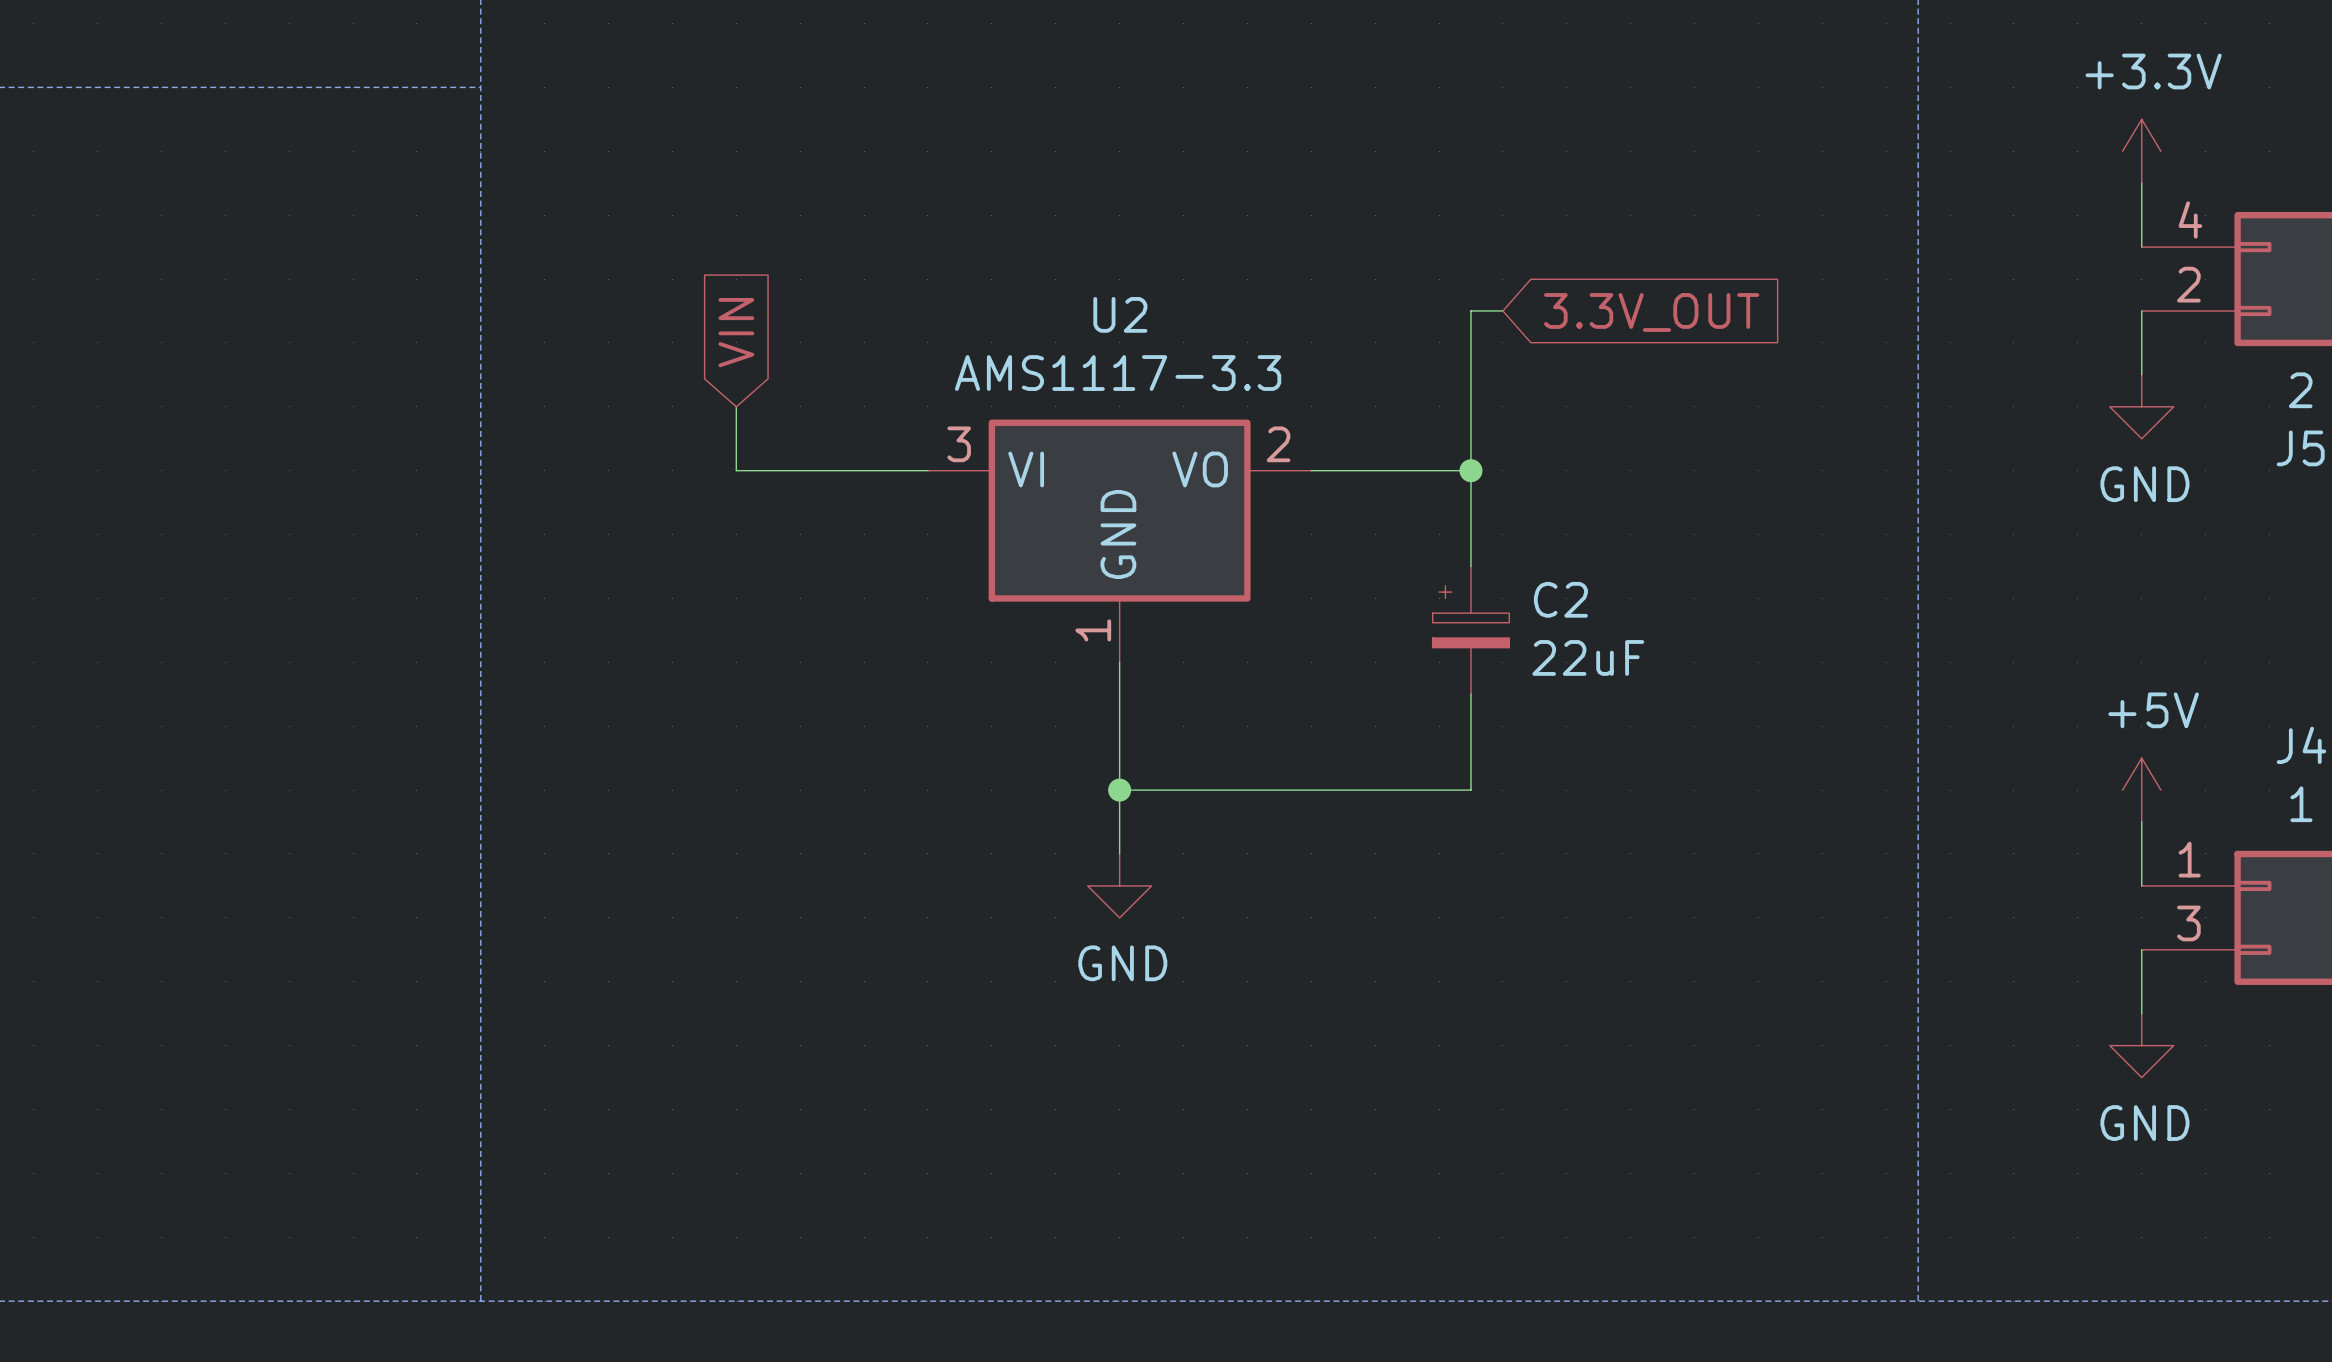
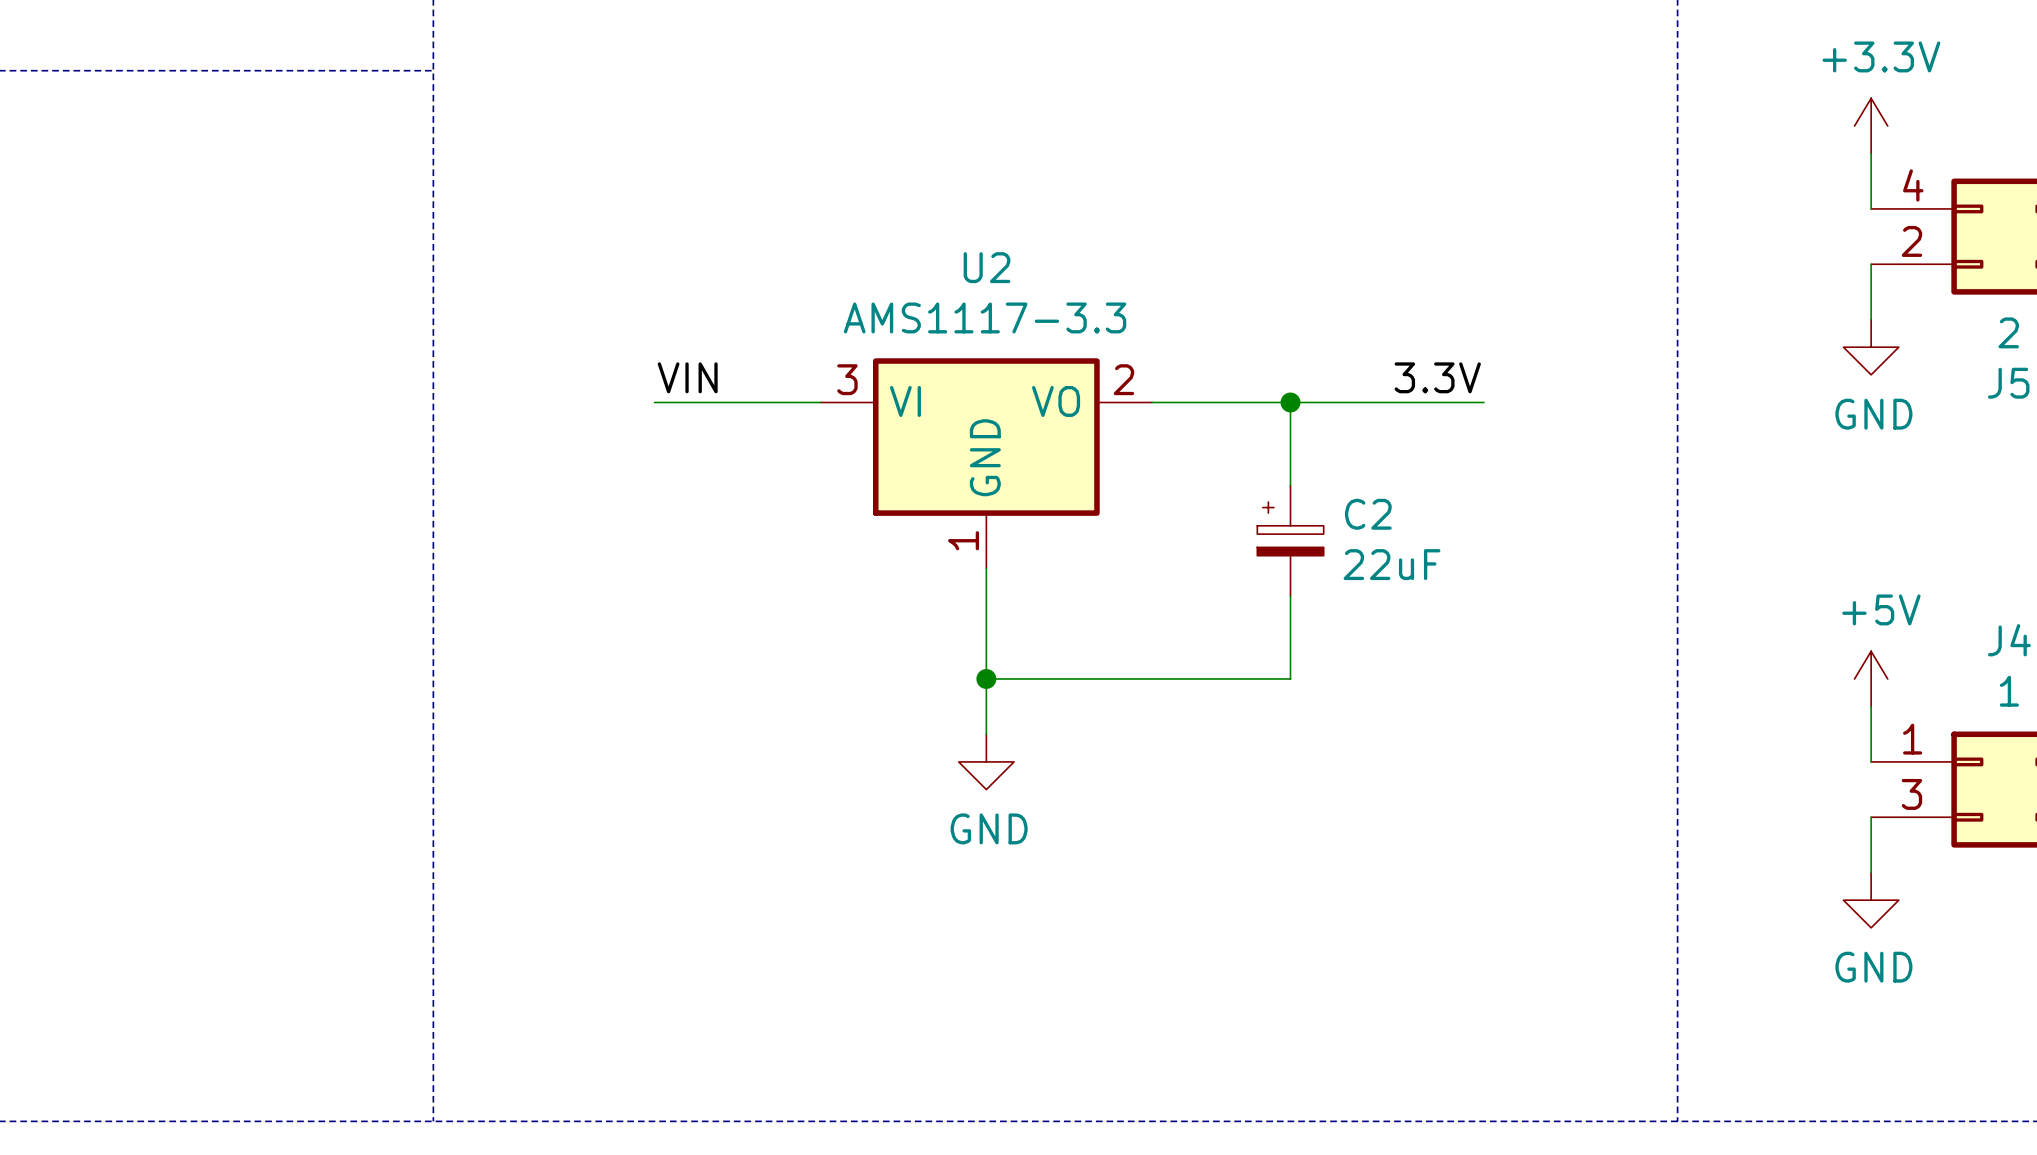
wire: (1502, 310) (1470, 310) (1470, 470) -> (1484, 402) (1290, 402)
global label: 3.3V_OUT (1651, 312) -> none
global label: VIN (736, 332) -> none
wire: (736, 406) (736, 470) -> none
label: none -> VIN (687, 377)
label: none -> 3.3V (1437, 377)

